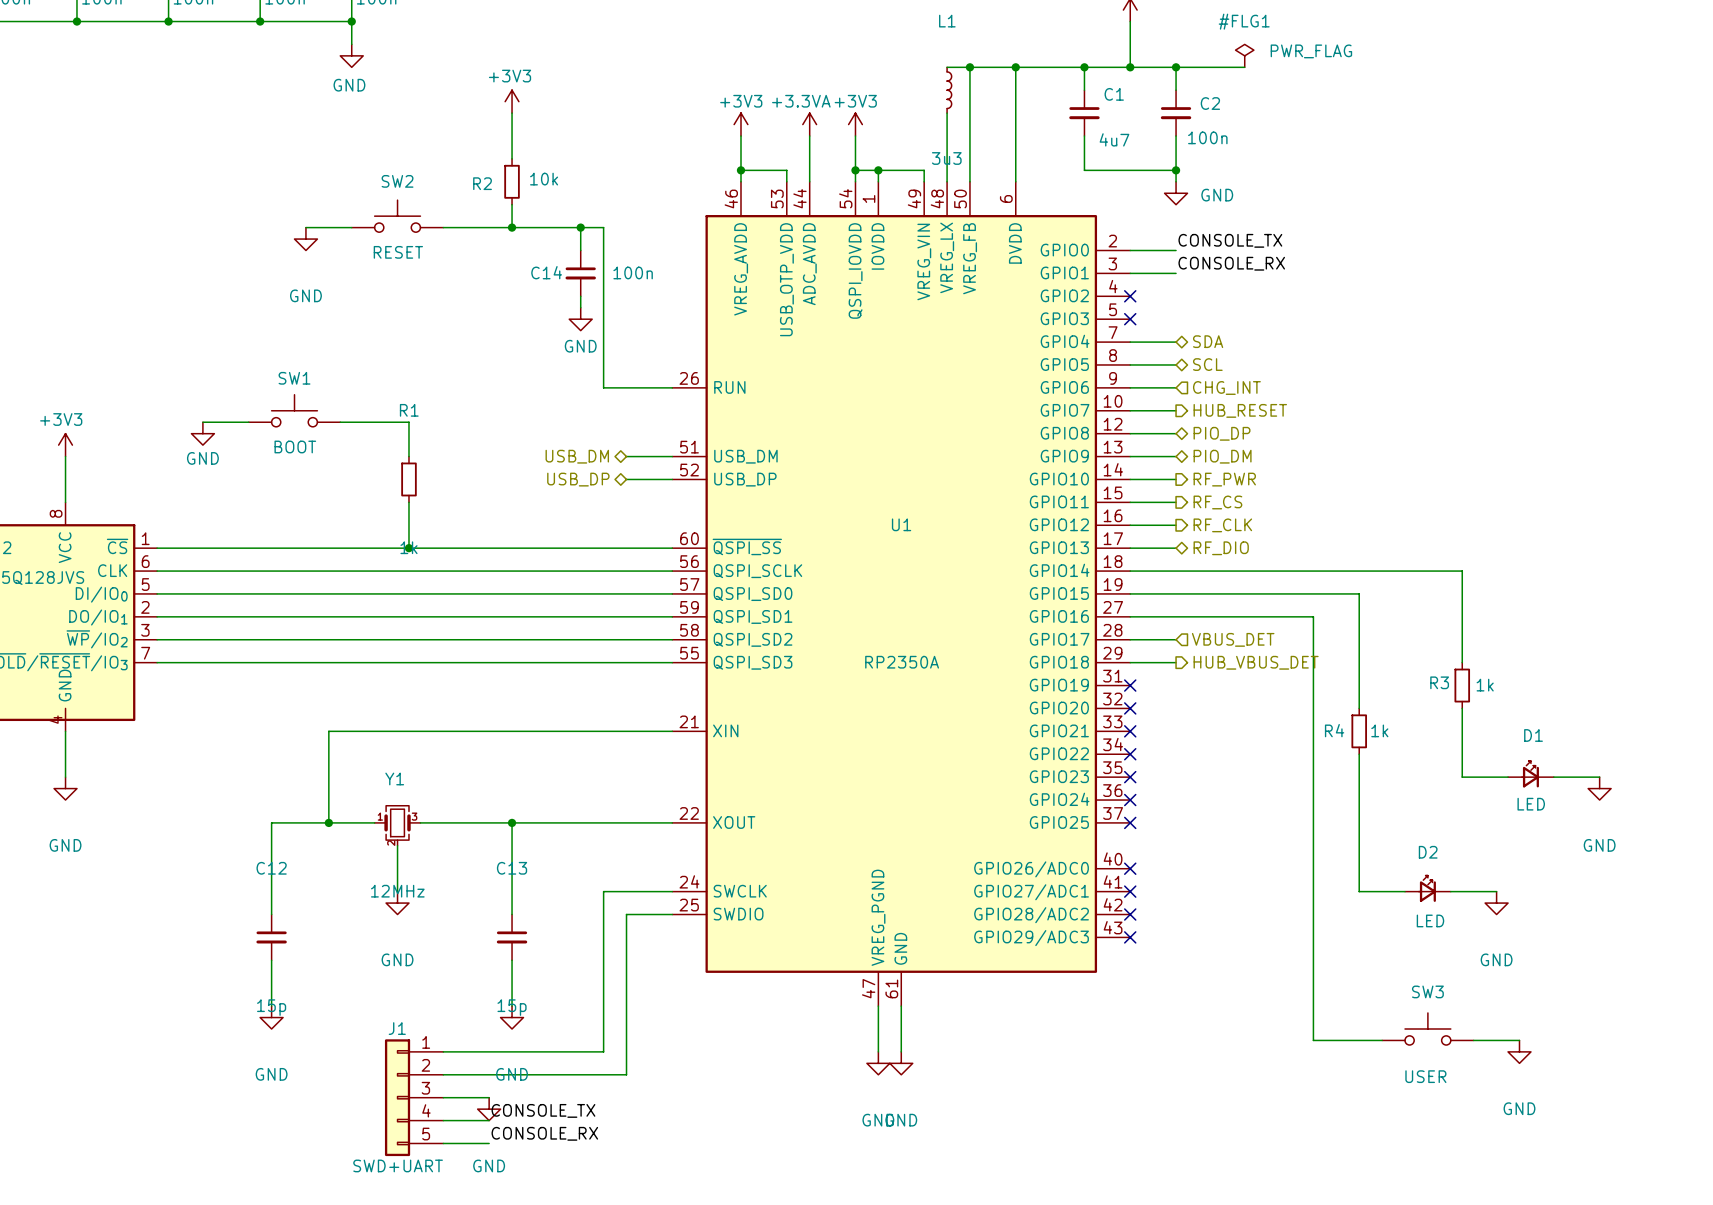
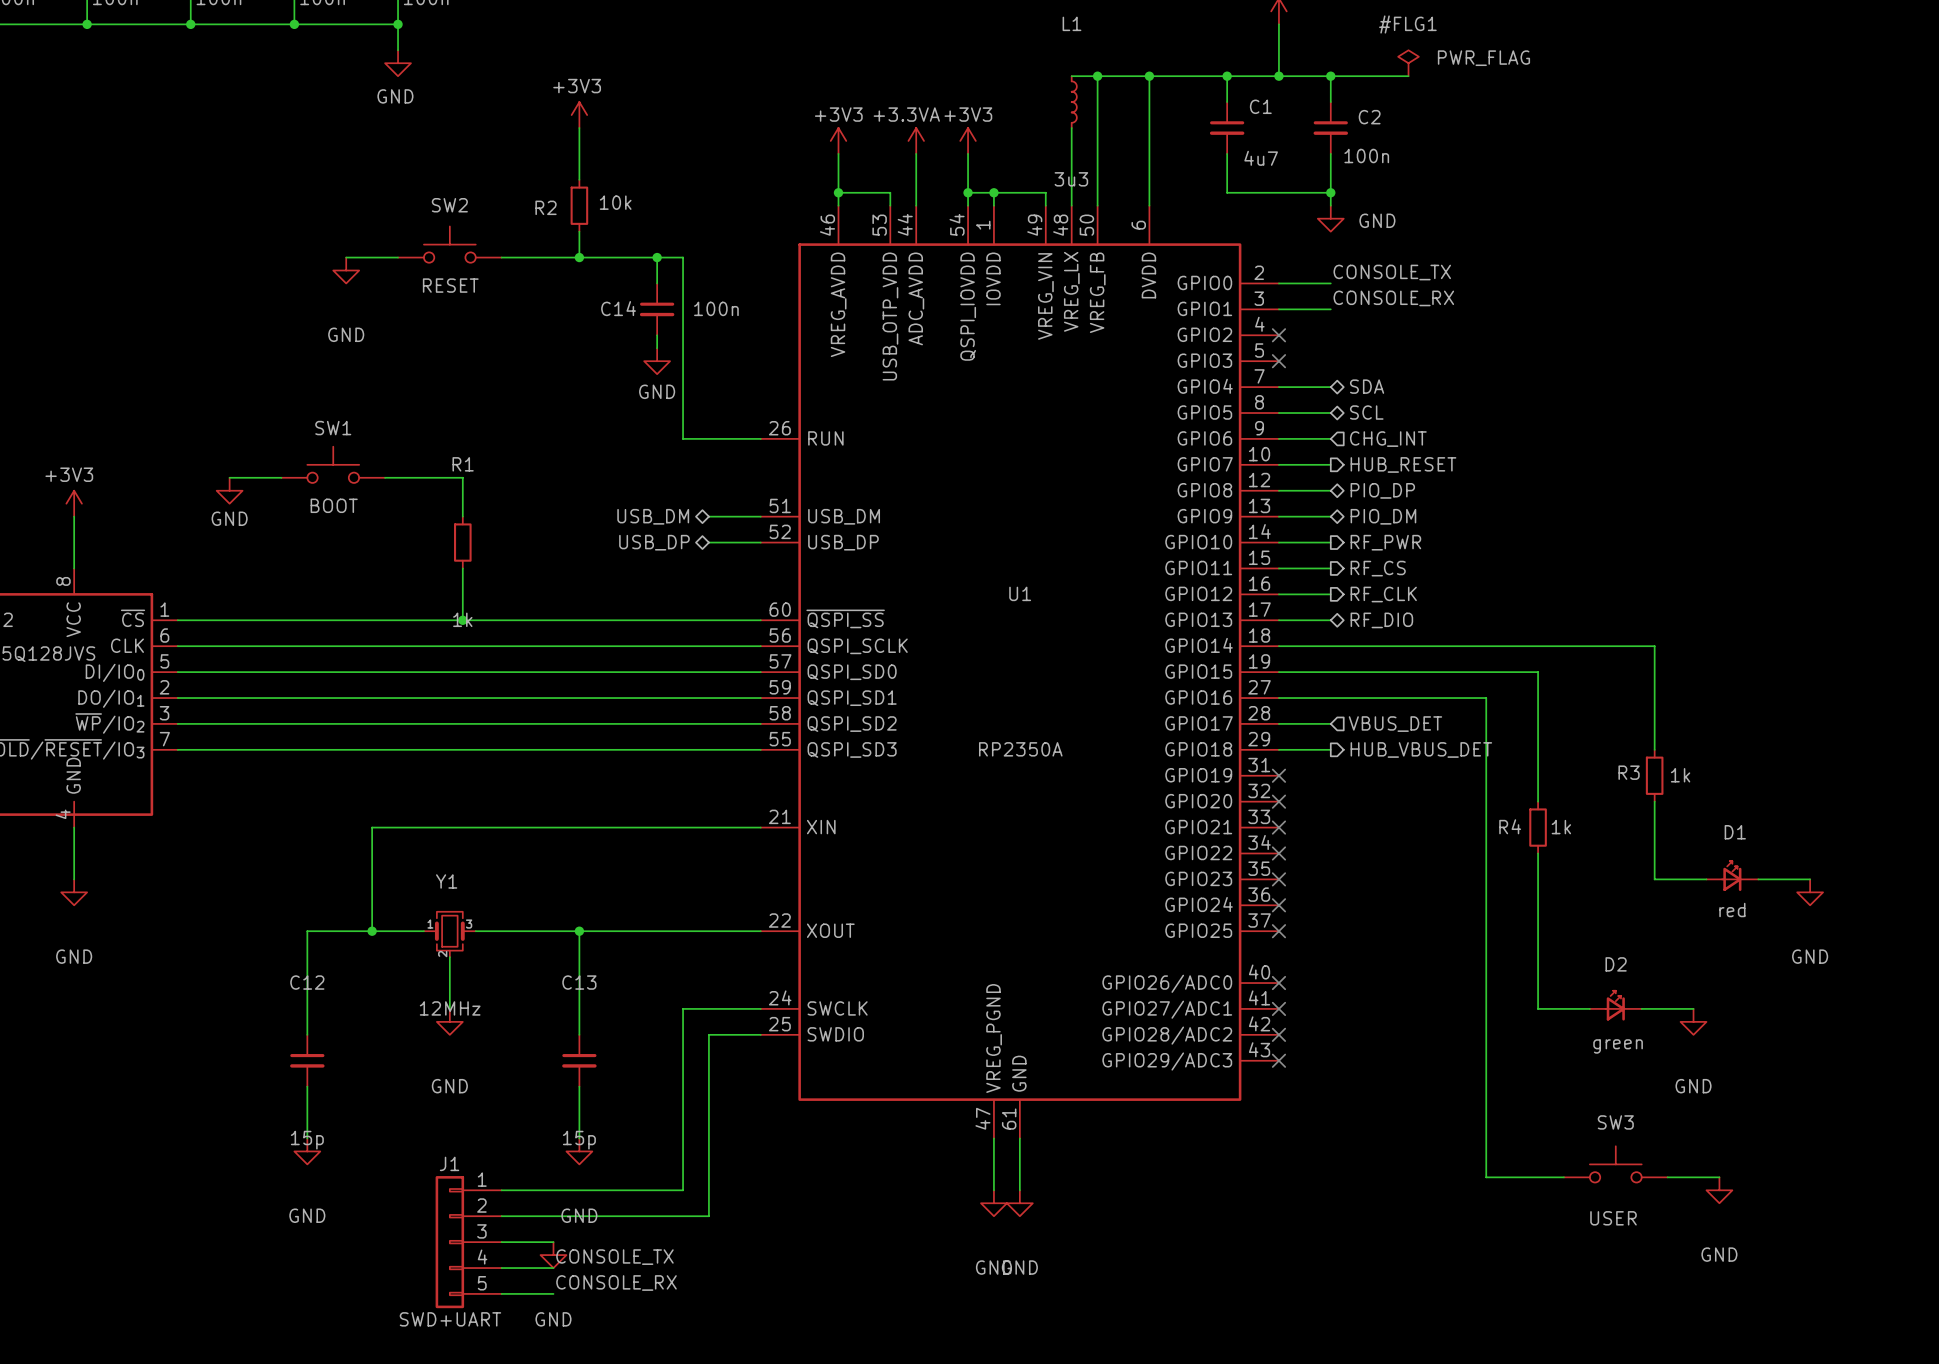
D1 value: LED (1531, 804) -> red (1732, 909)
D2 value: LED (1430, 920) -> green (1618, 1046)

